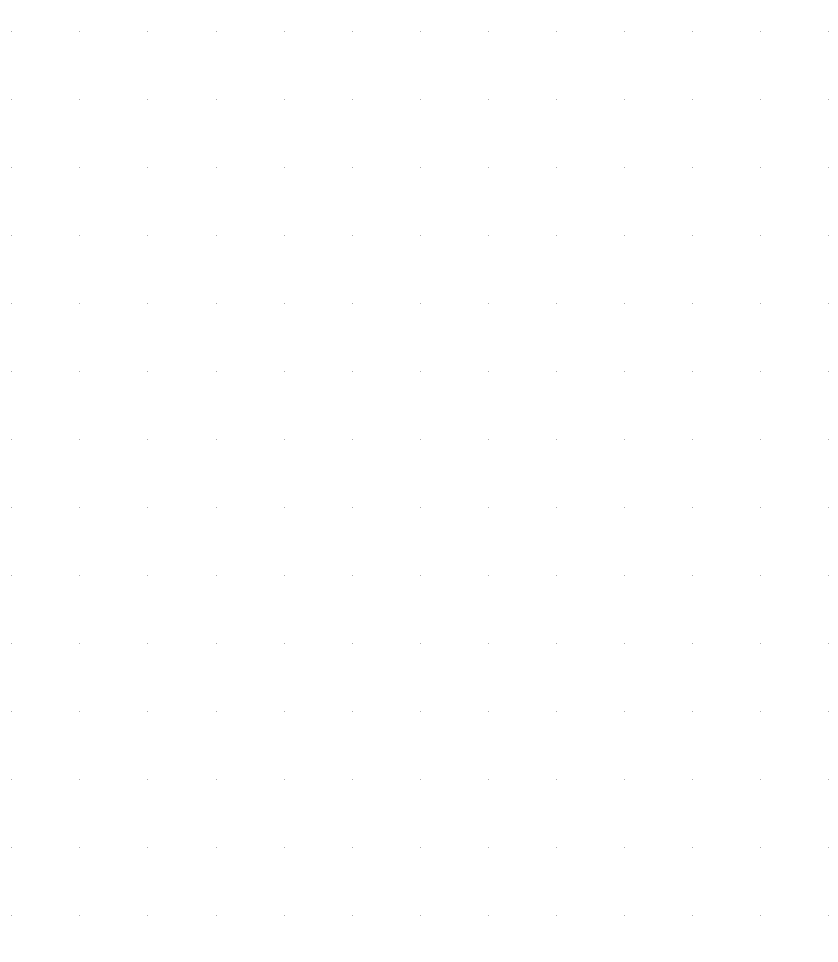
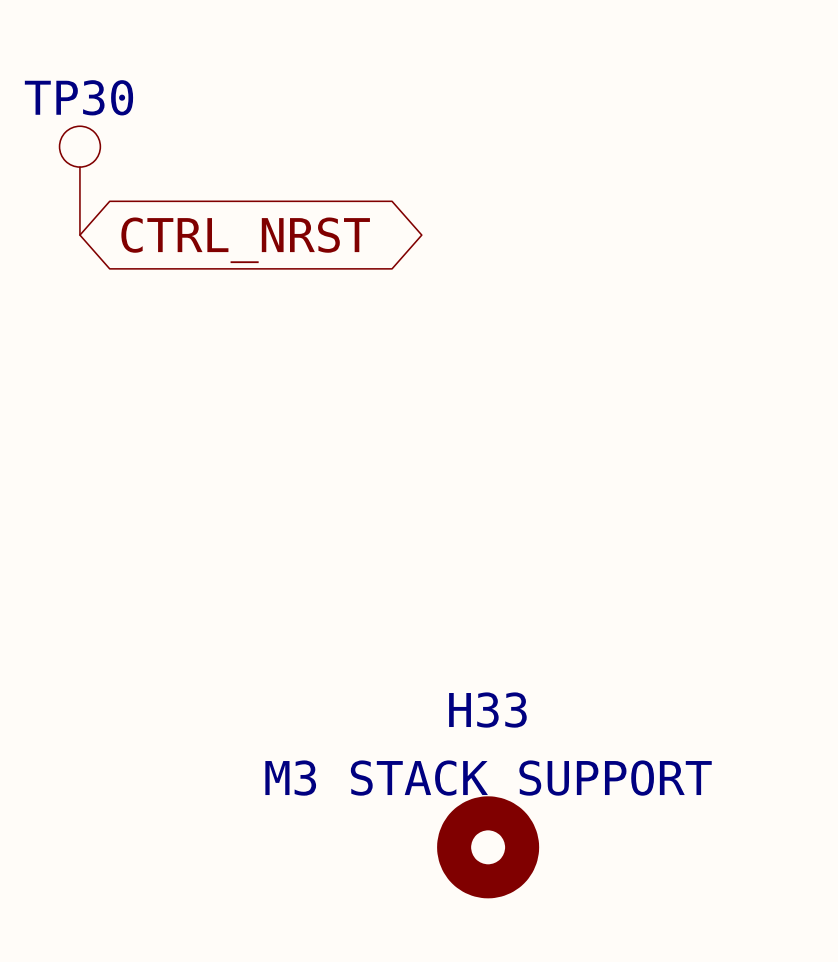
TP30: none -> (79, 180)
global label: none -> CTRL_NRST (245, 240)
H33: none -> M3 STACK SUPPORT (488, 847)

